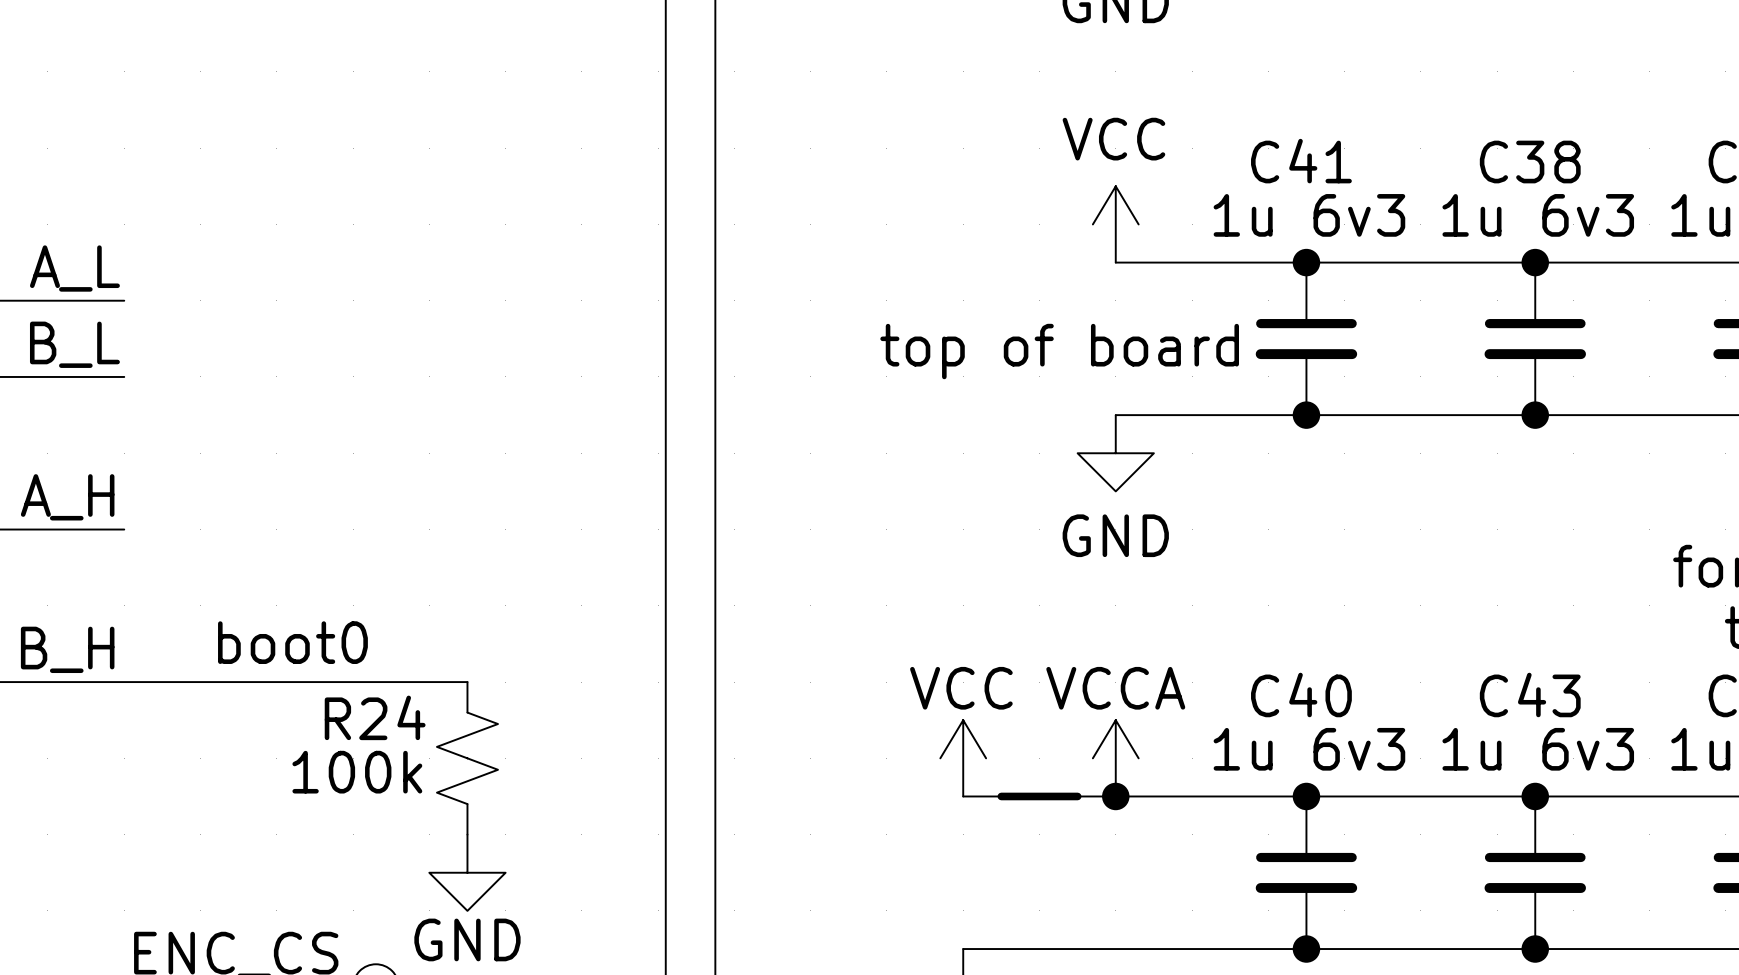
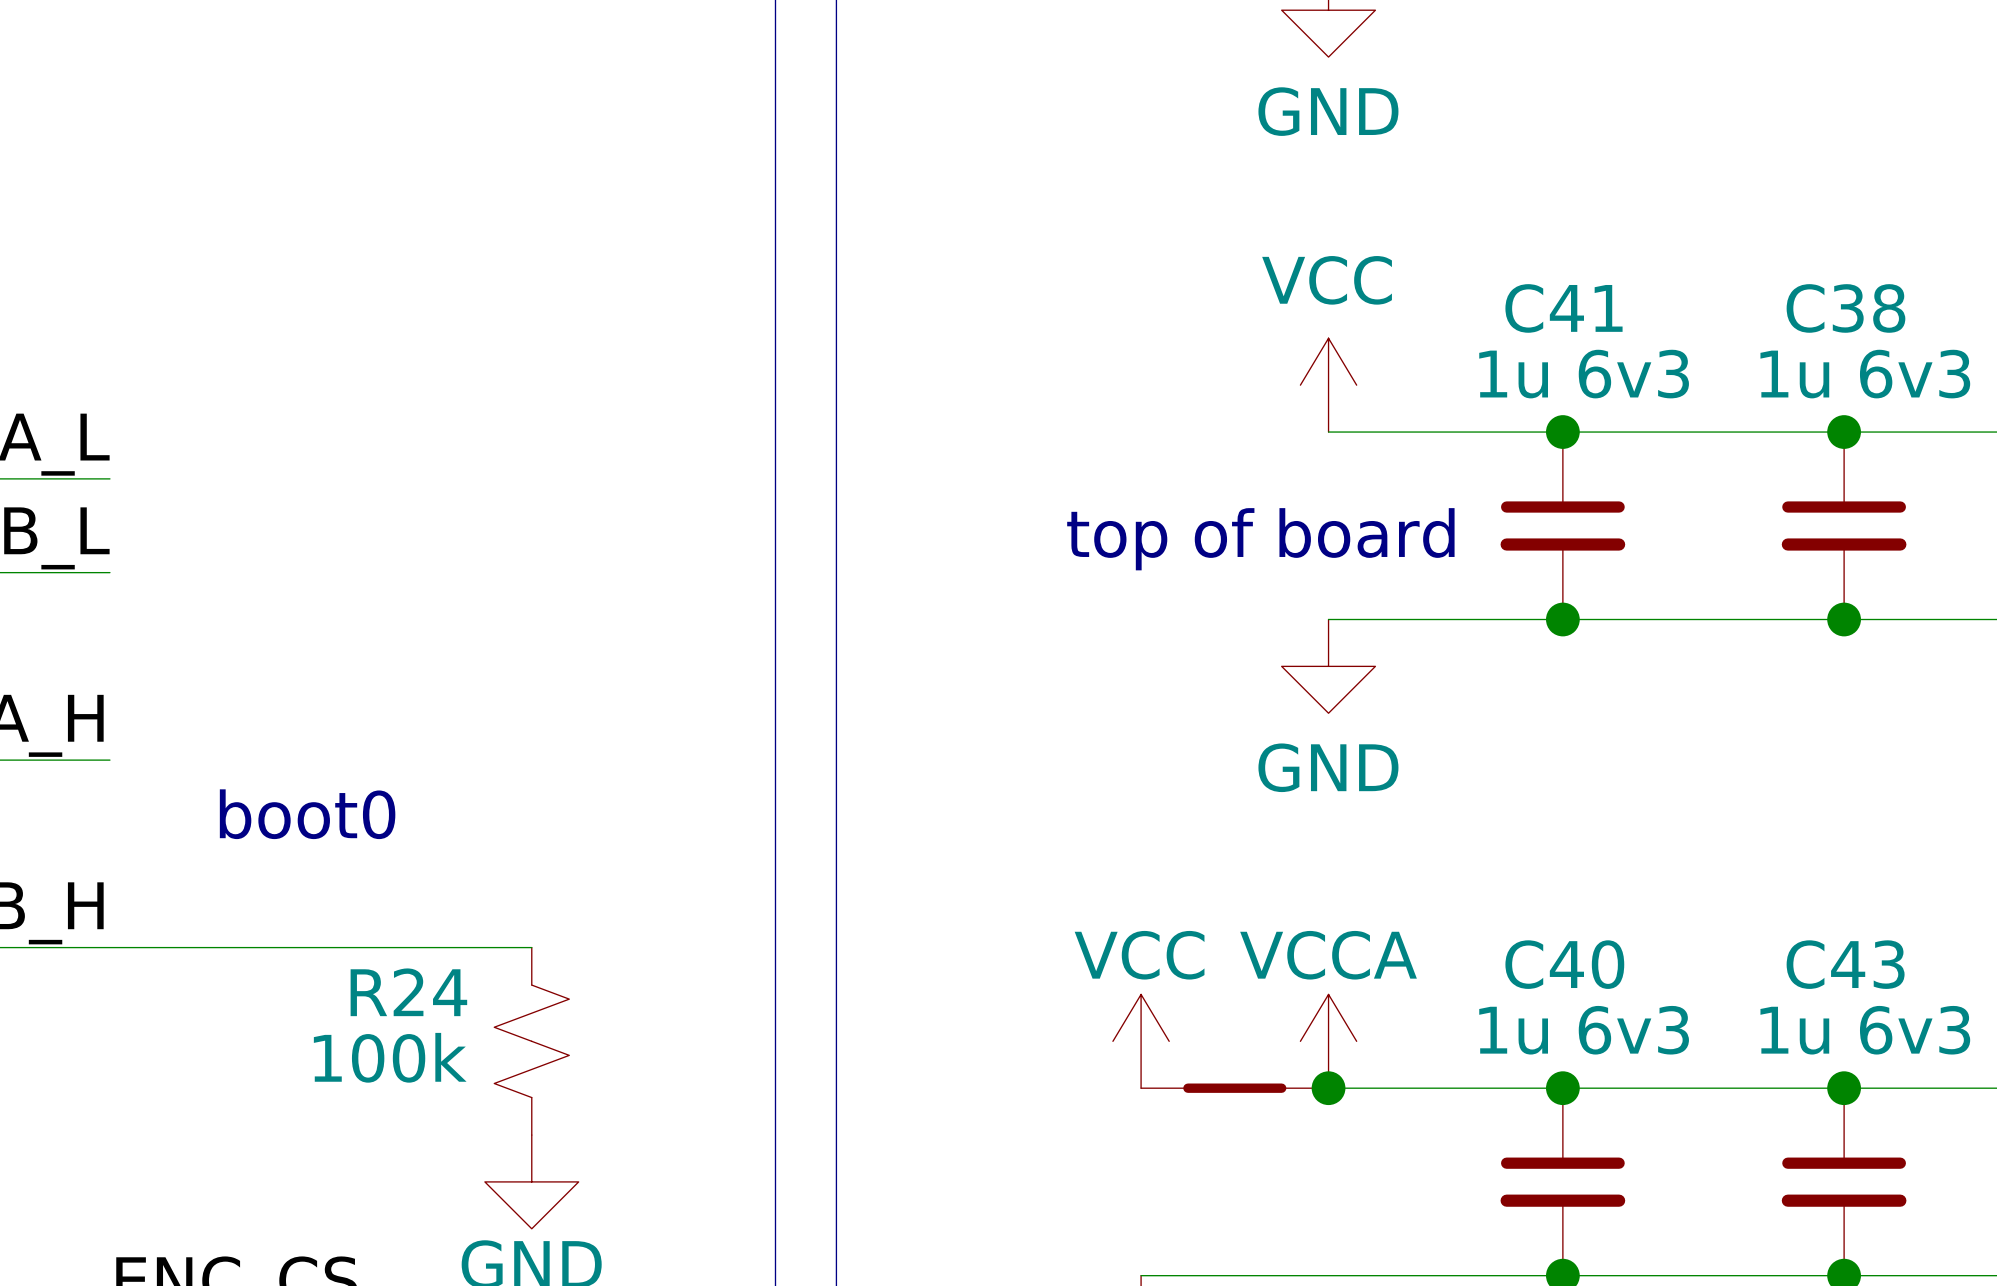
text position: boot0 (292, 642) -> boot0 (307, 814)

